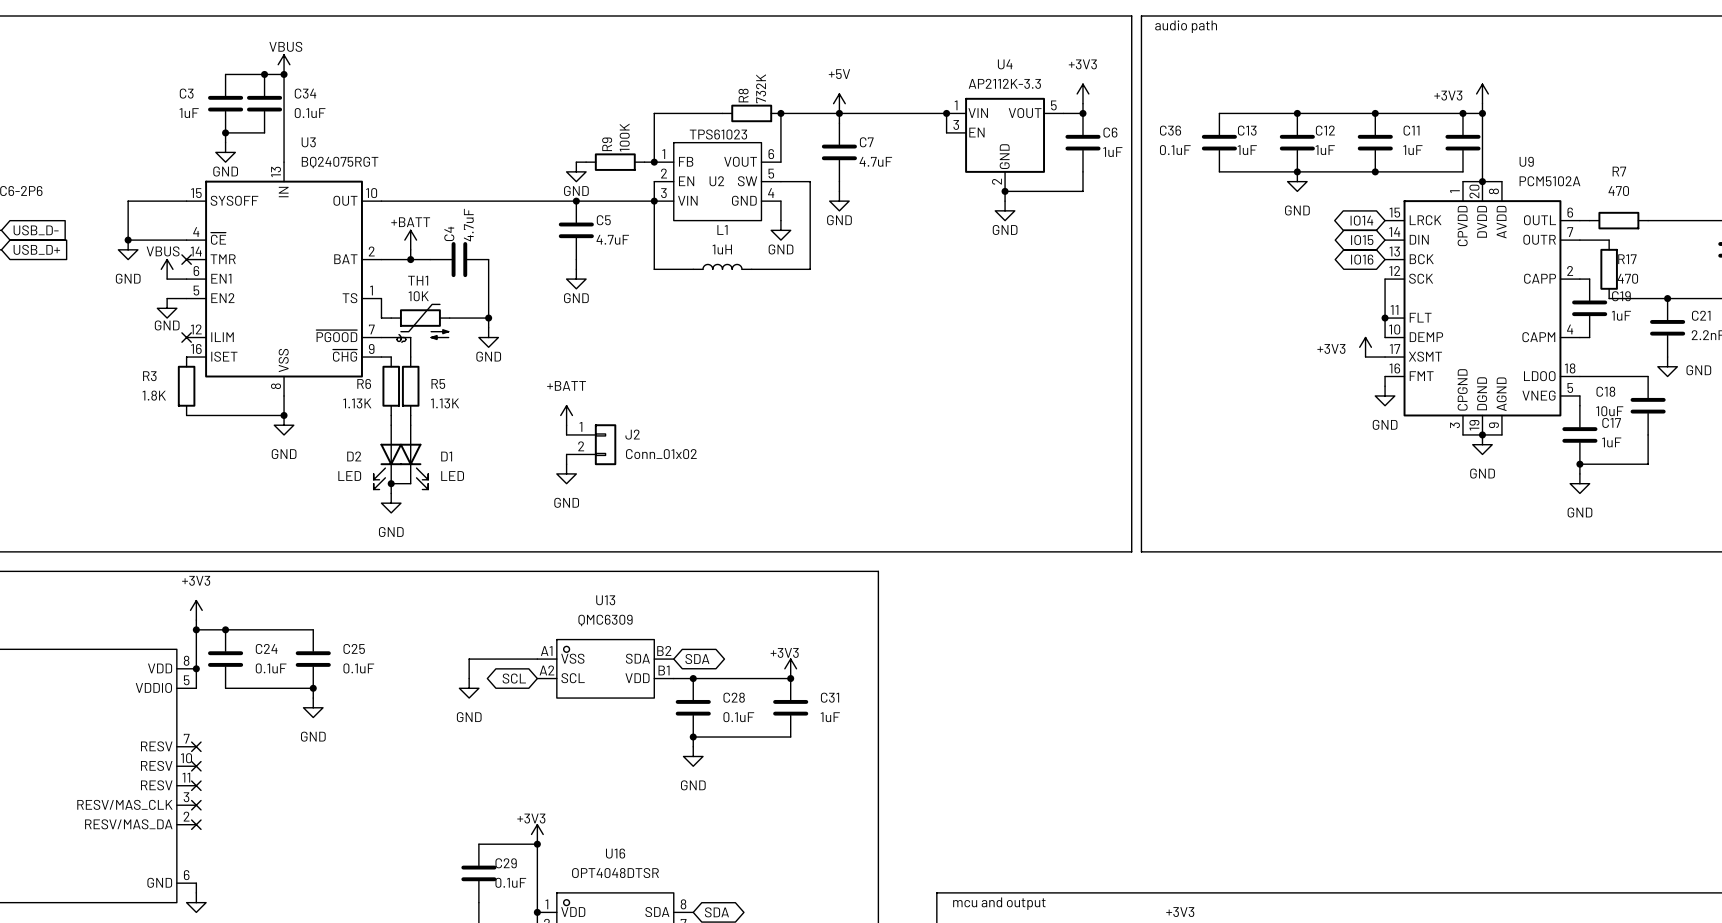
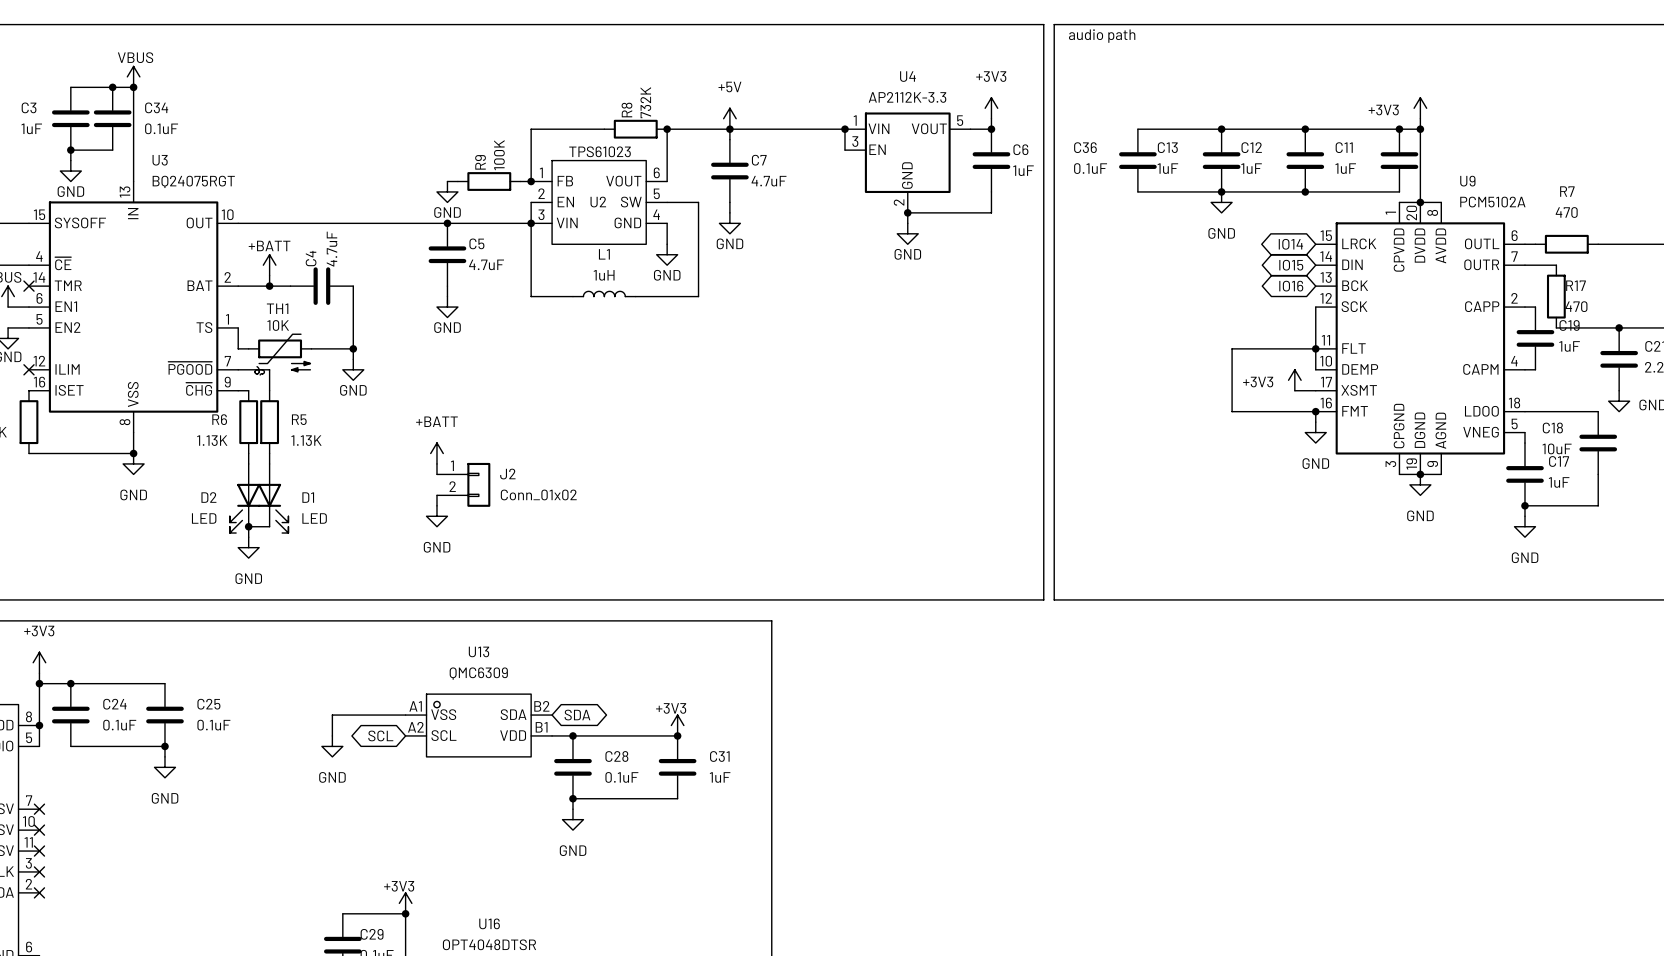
wire: none -> (1315, 348) (1232, 348) (1232, 411) (1315, 411)
junction: none -> (1315, 411)

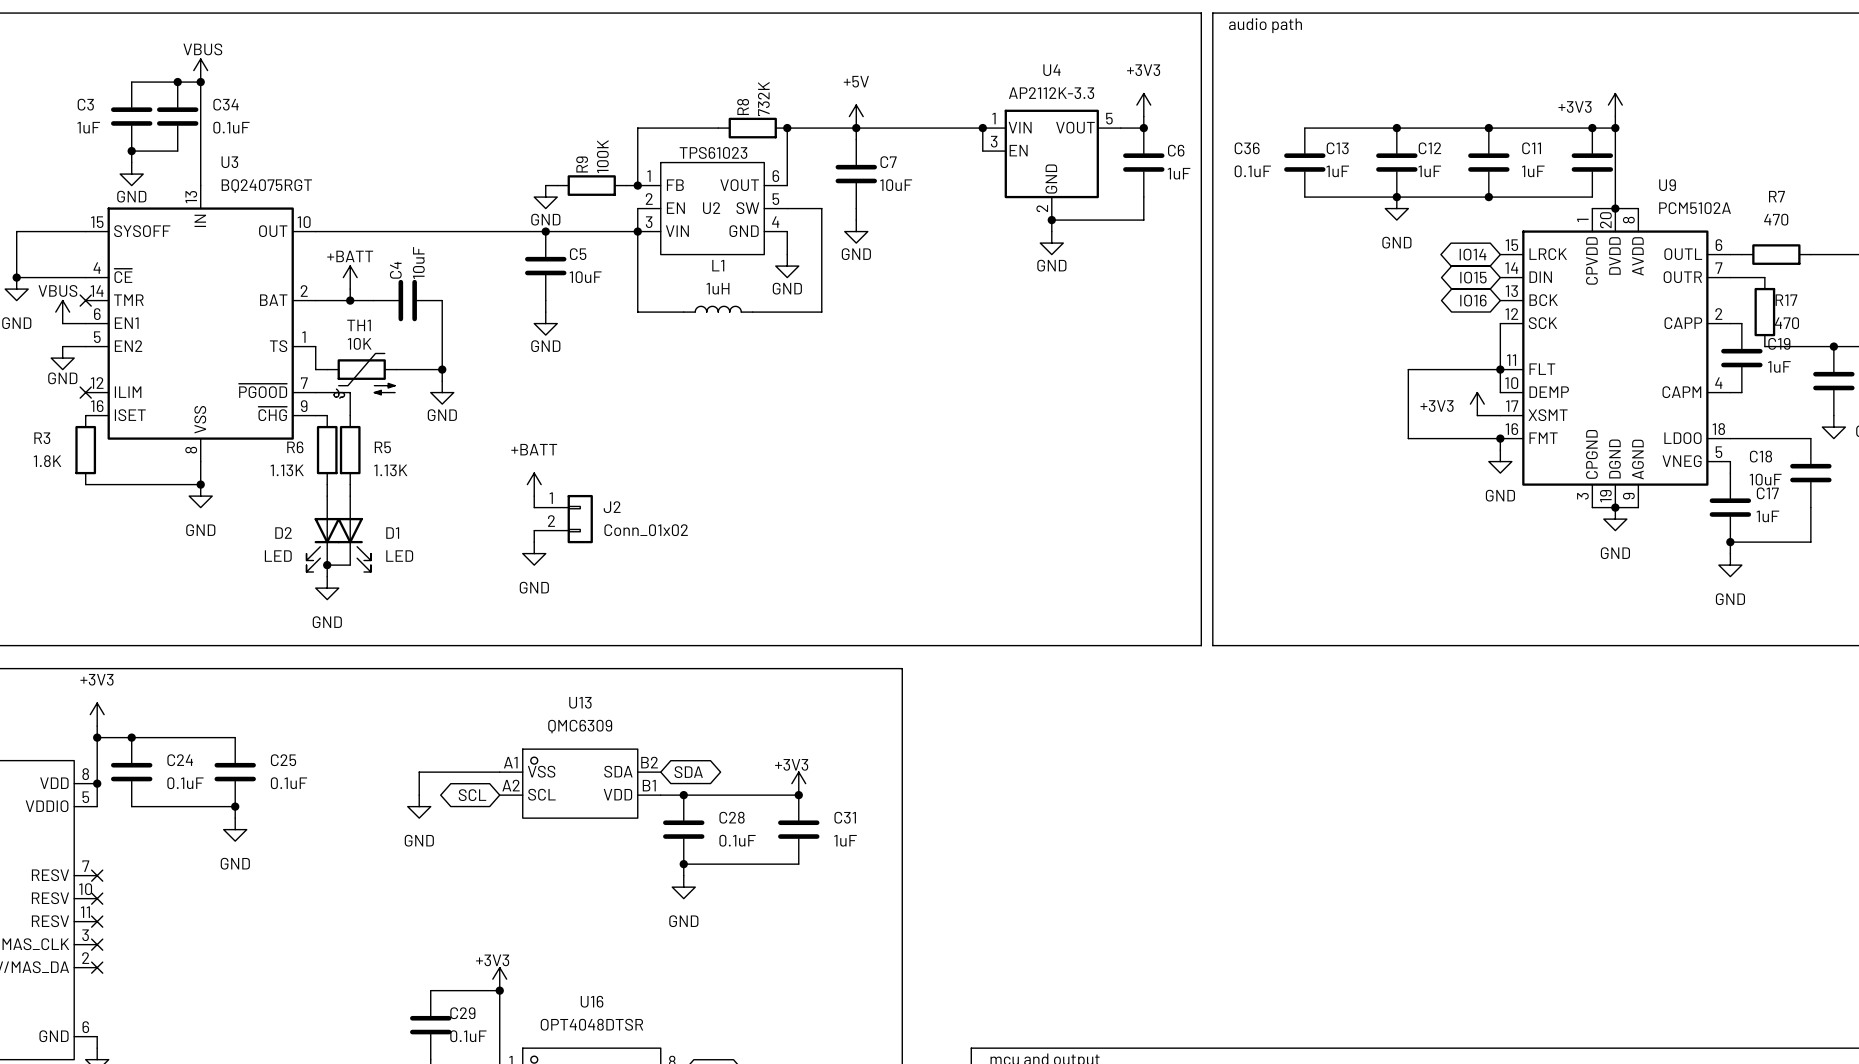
C7 value: 4.7uF (769, 181) -> 10uF (896, 185)
C4 value: 4.7uF (332, 249) -> 10uF (418, 263)
C5 value: 4.7uF (486, 264) -> 10uF (585, 277)

